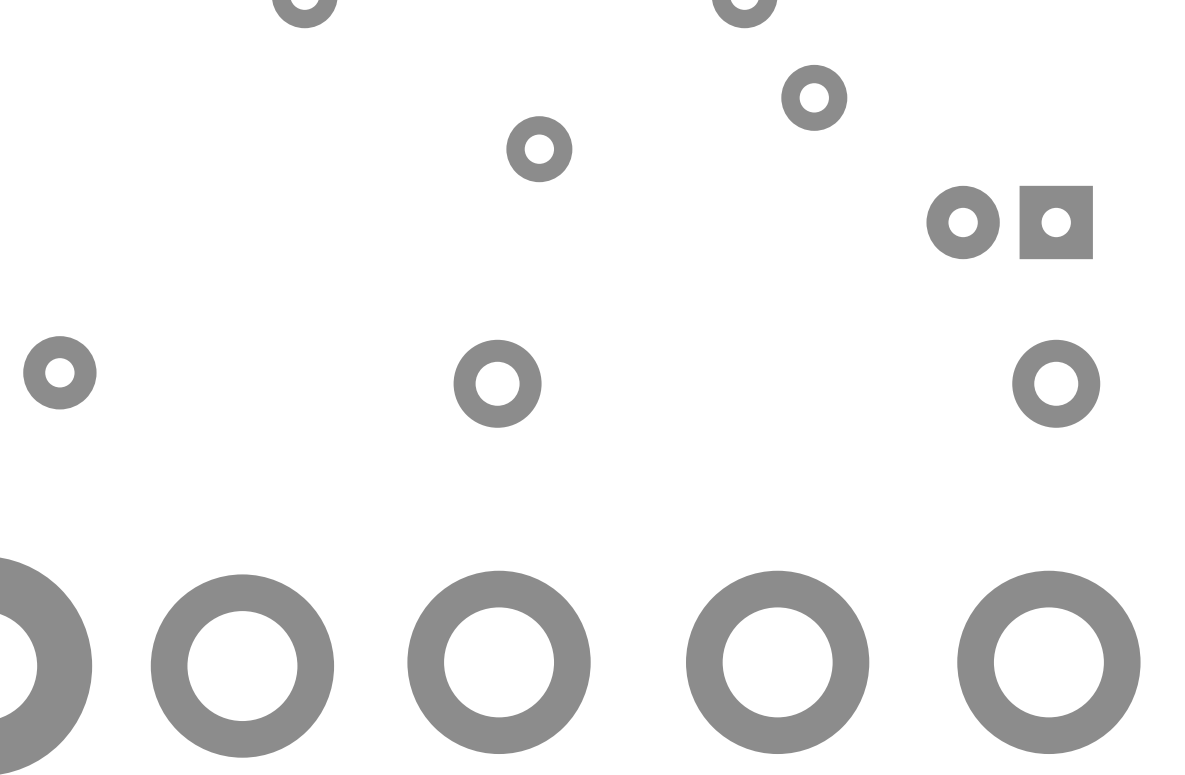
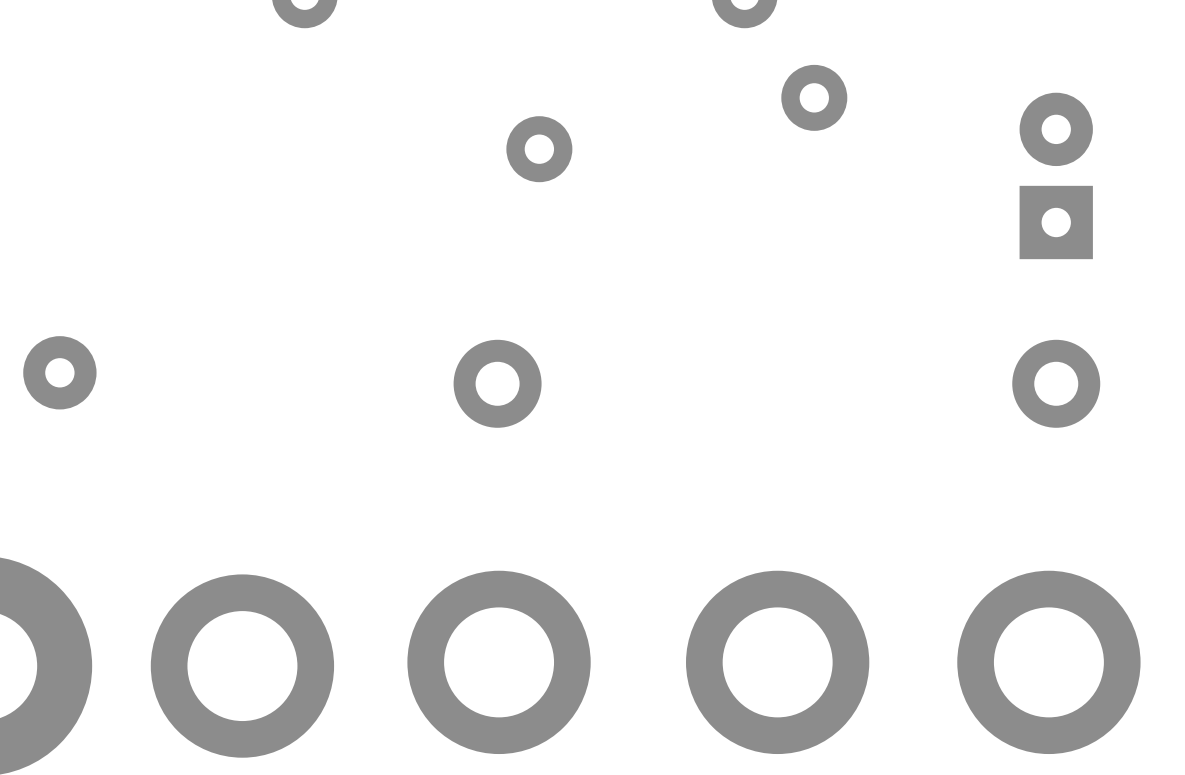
part rotation: 0° (1009, 222) -> 90° clockwise (1056, 175)

